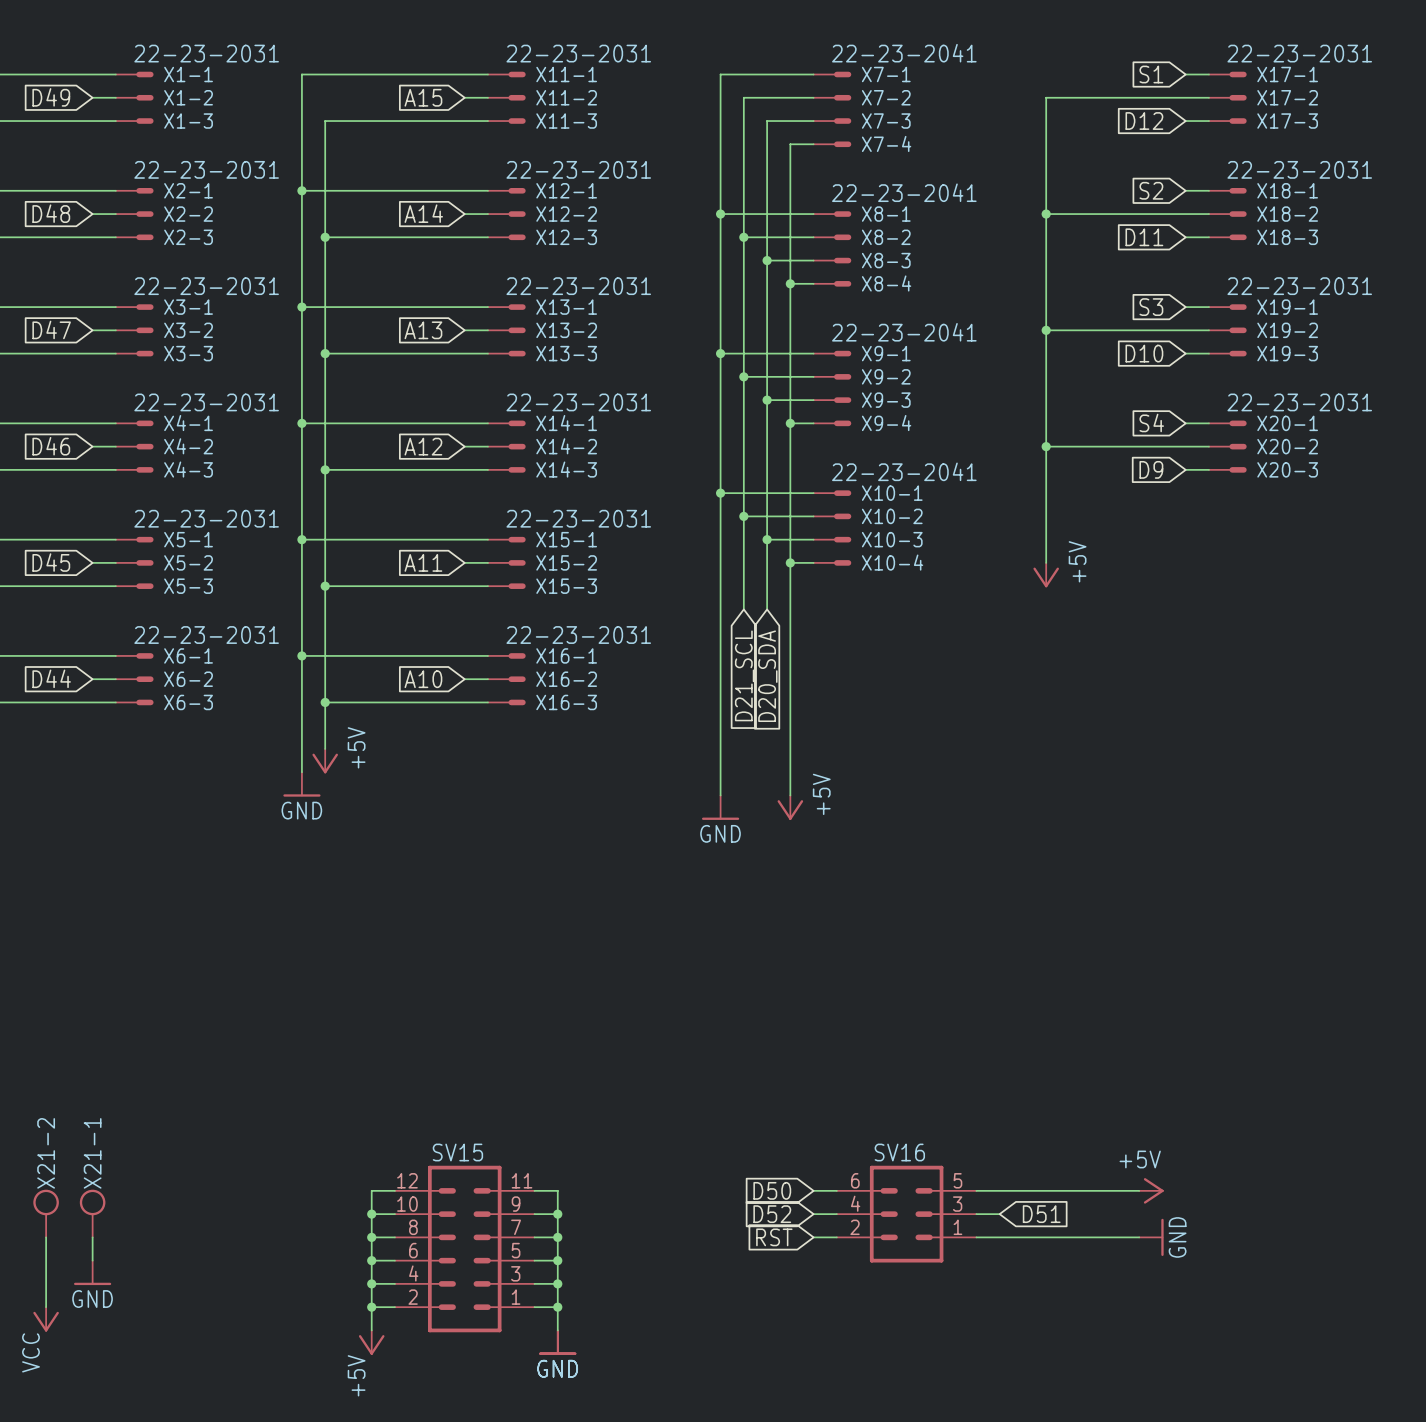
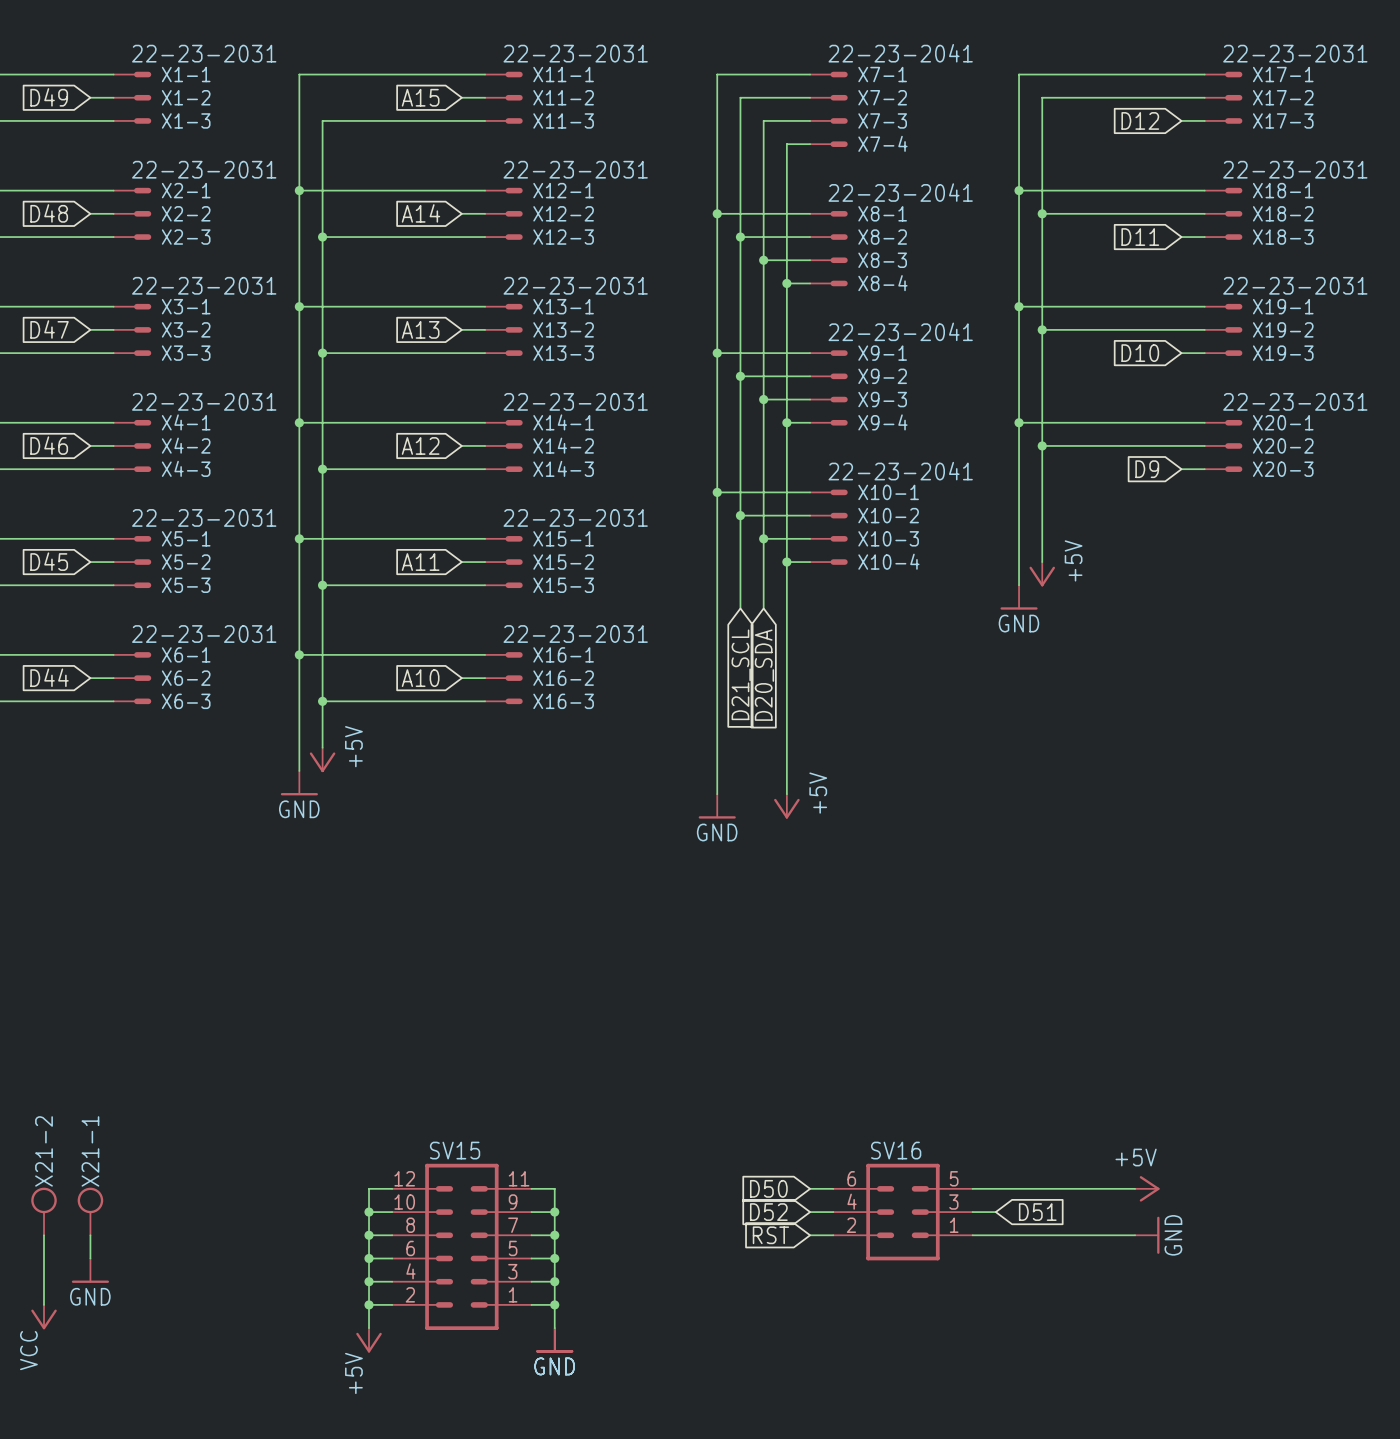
global label: S1 (1151, 74) -> none
wire: none -> (1181, 74) (1019, 74) (1019, 585)
wire: none -> (1019, 190) (1181, 190)
junction: none -> (1019, 190)
global label: S2 (1151, 190) -> none
wire: none -> (1019, 306) (1181, 306)
junction: none -> (1019, 306)
global label: S3 (1151, 307) -> none
global label: S4 (1151, 422) -> none
wire: none -> (1019, 422) (1181, 422)
junction: none -> (1019, 422)
power symbol: none -> GND (1019, 597)

